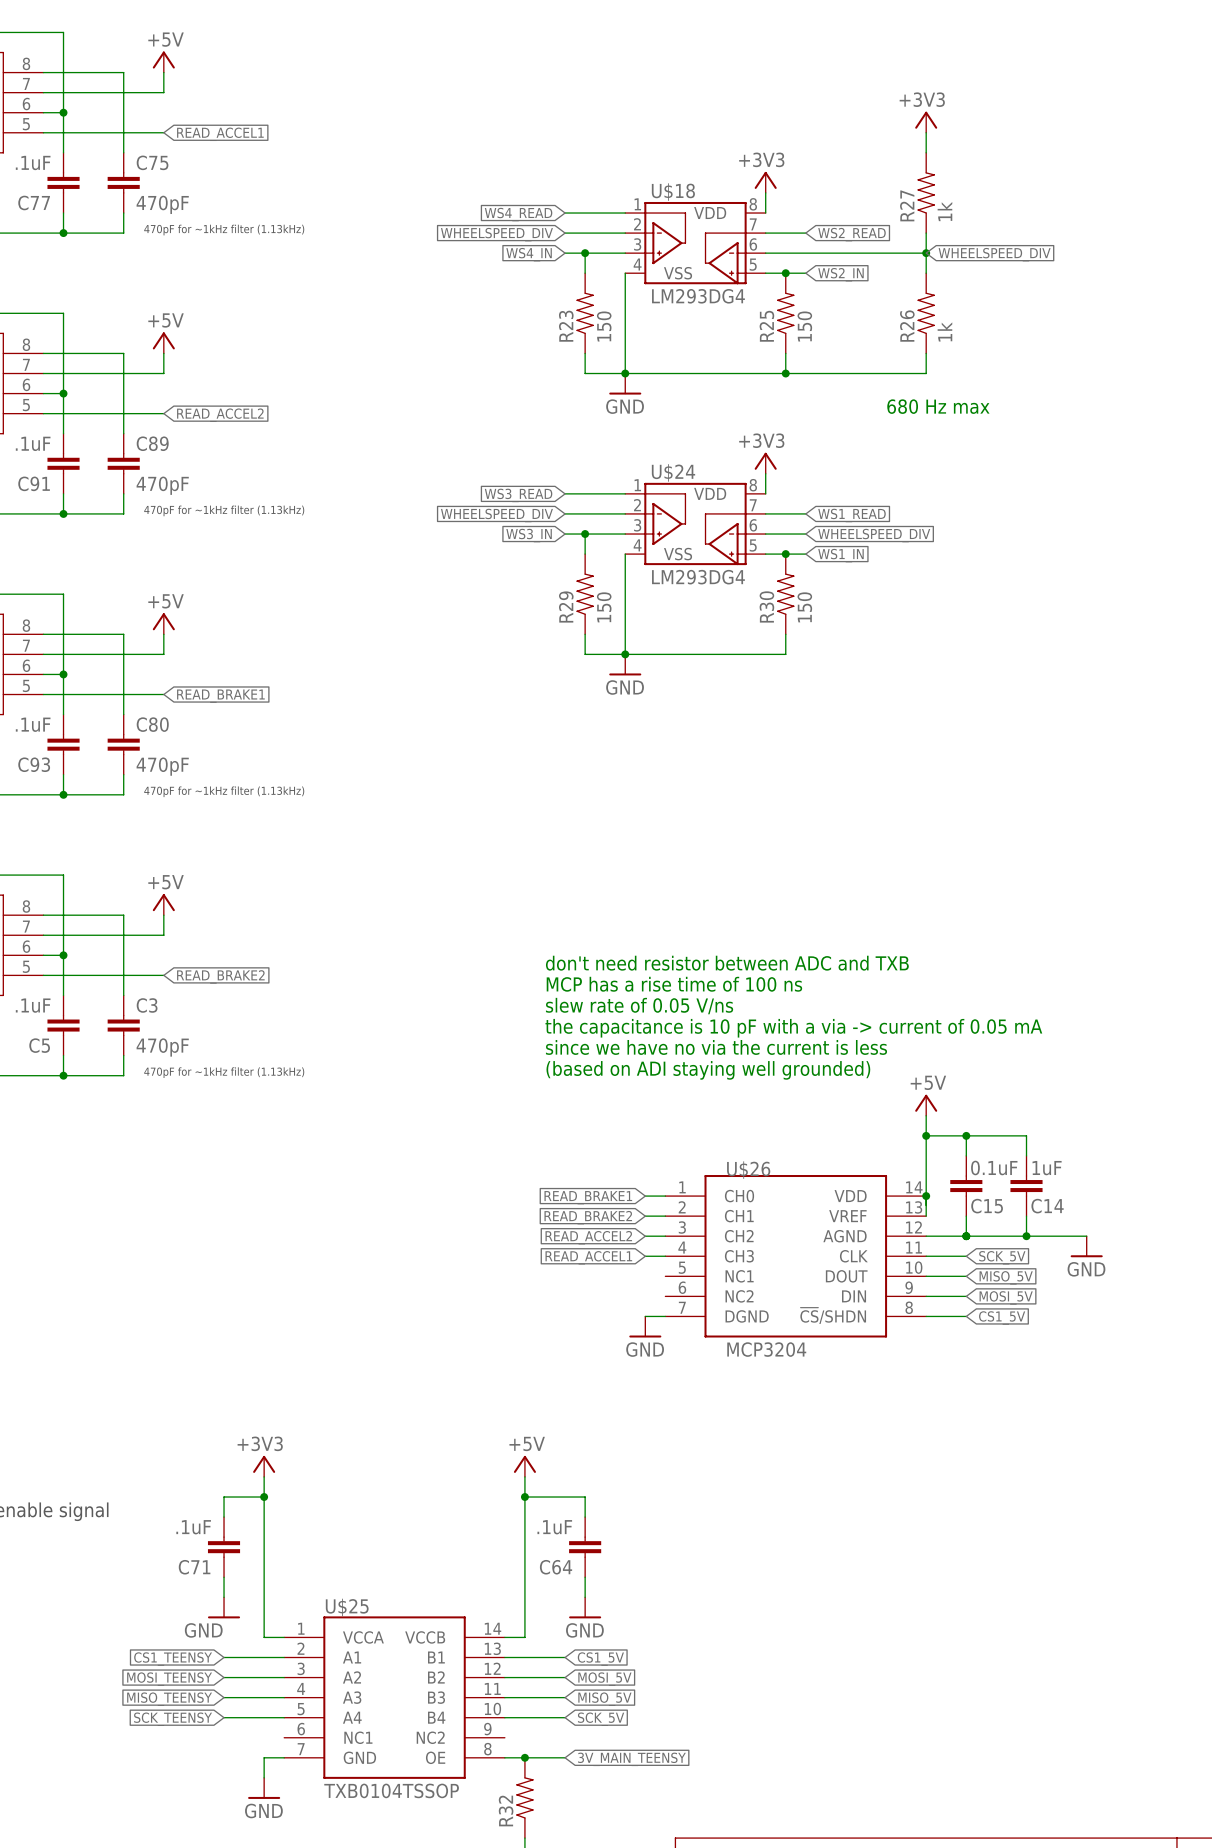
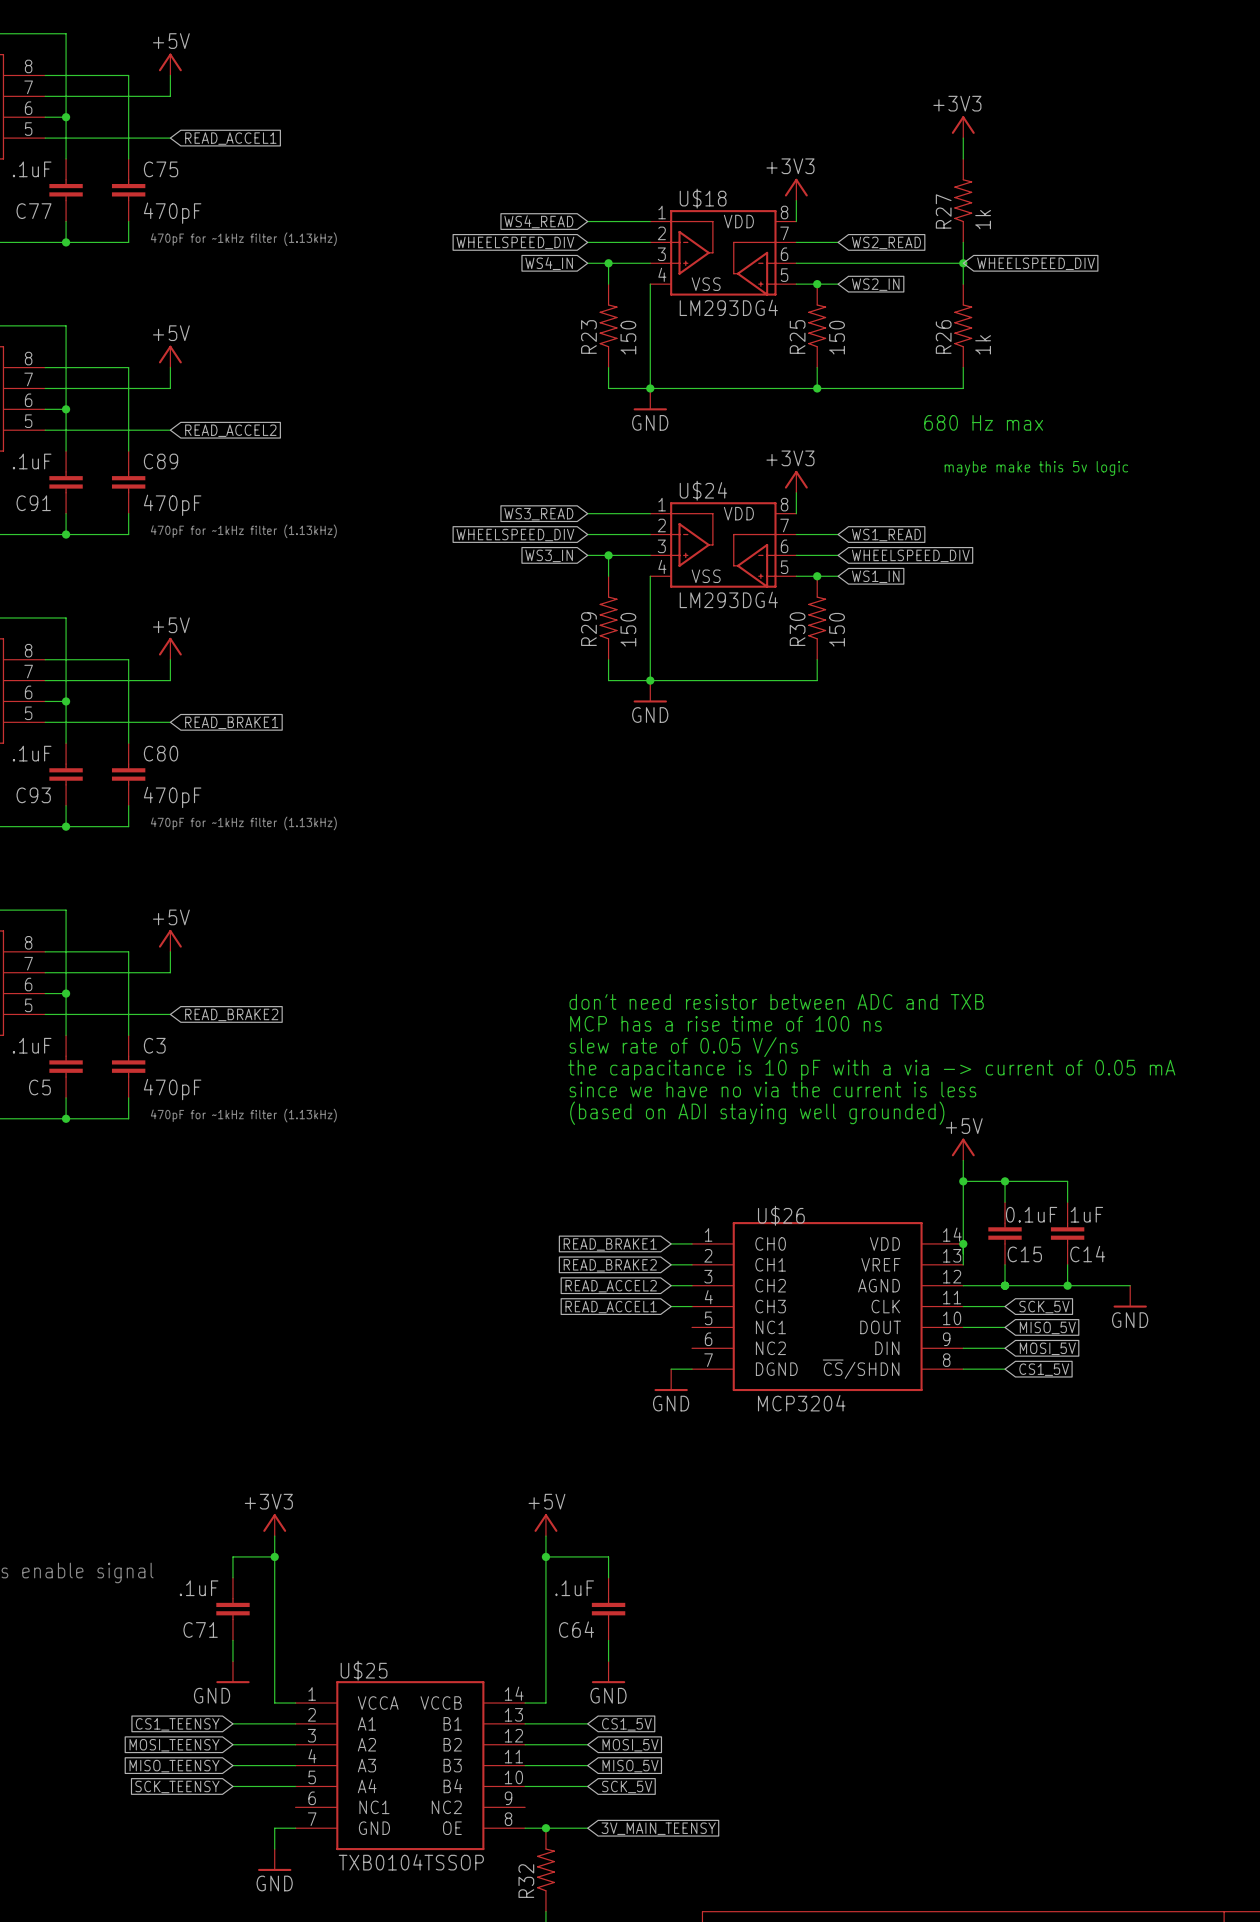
text: none -> maybe make this 5v logic (1036, 468)

